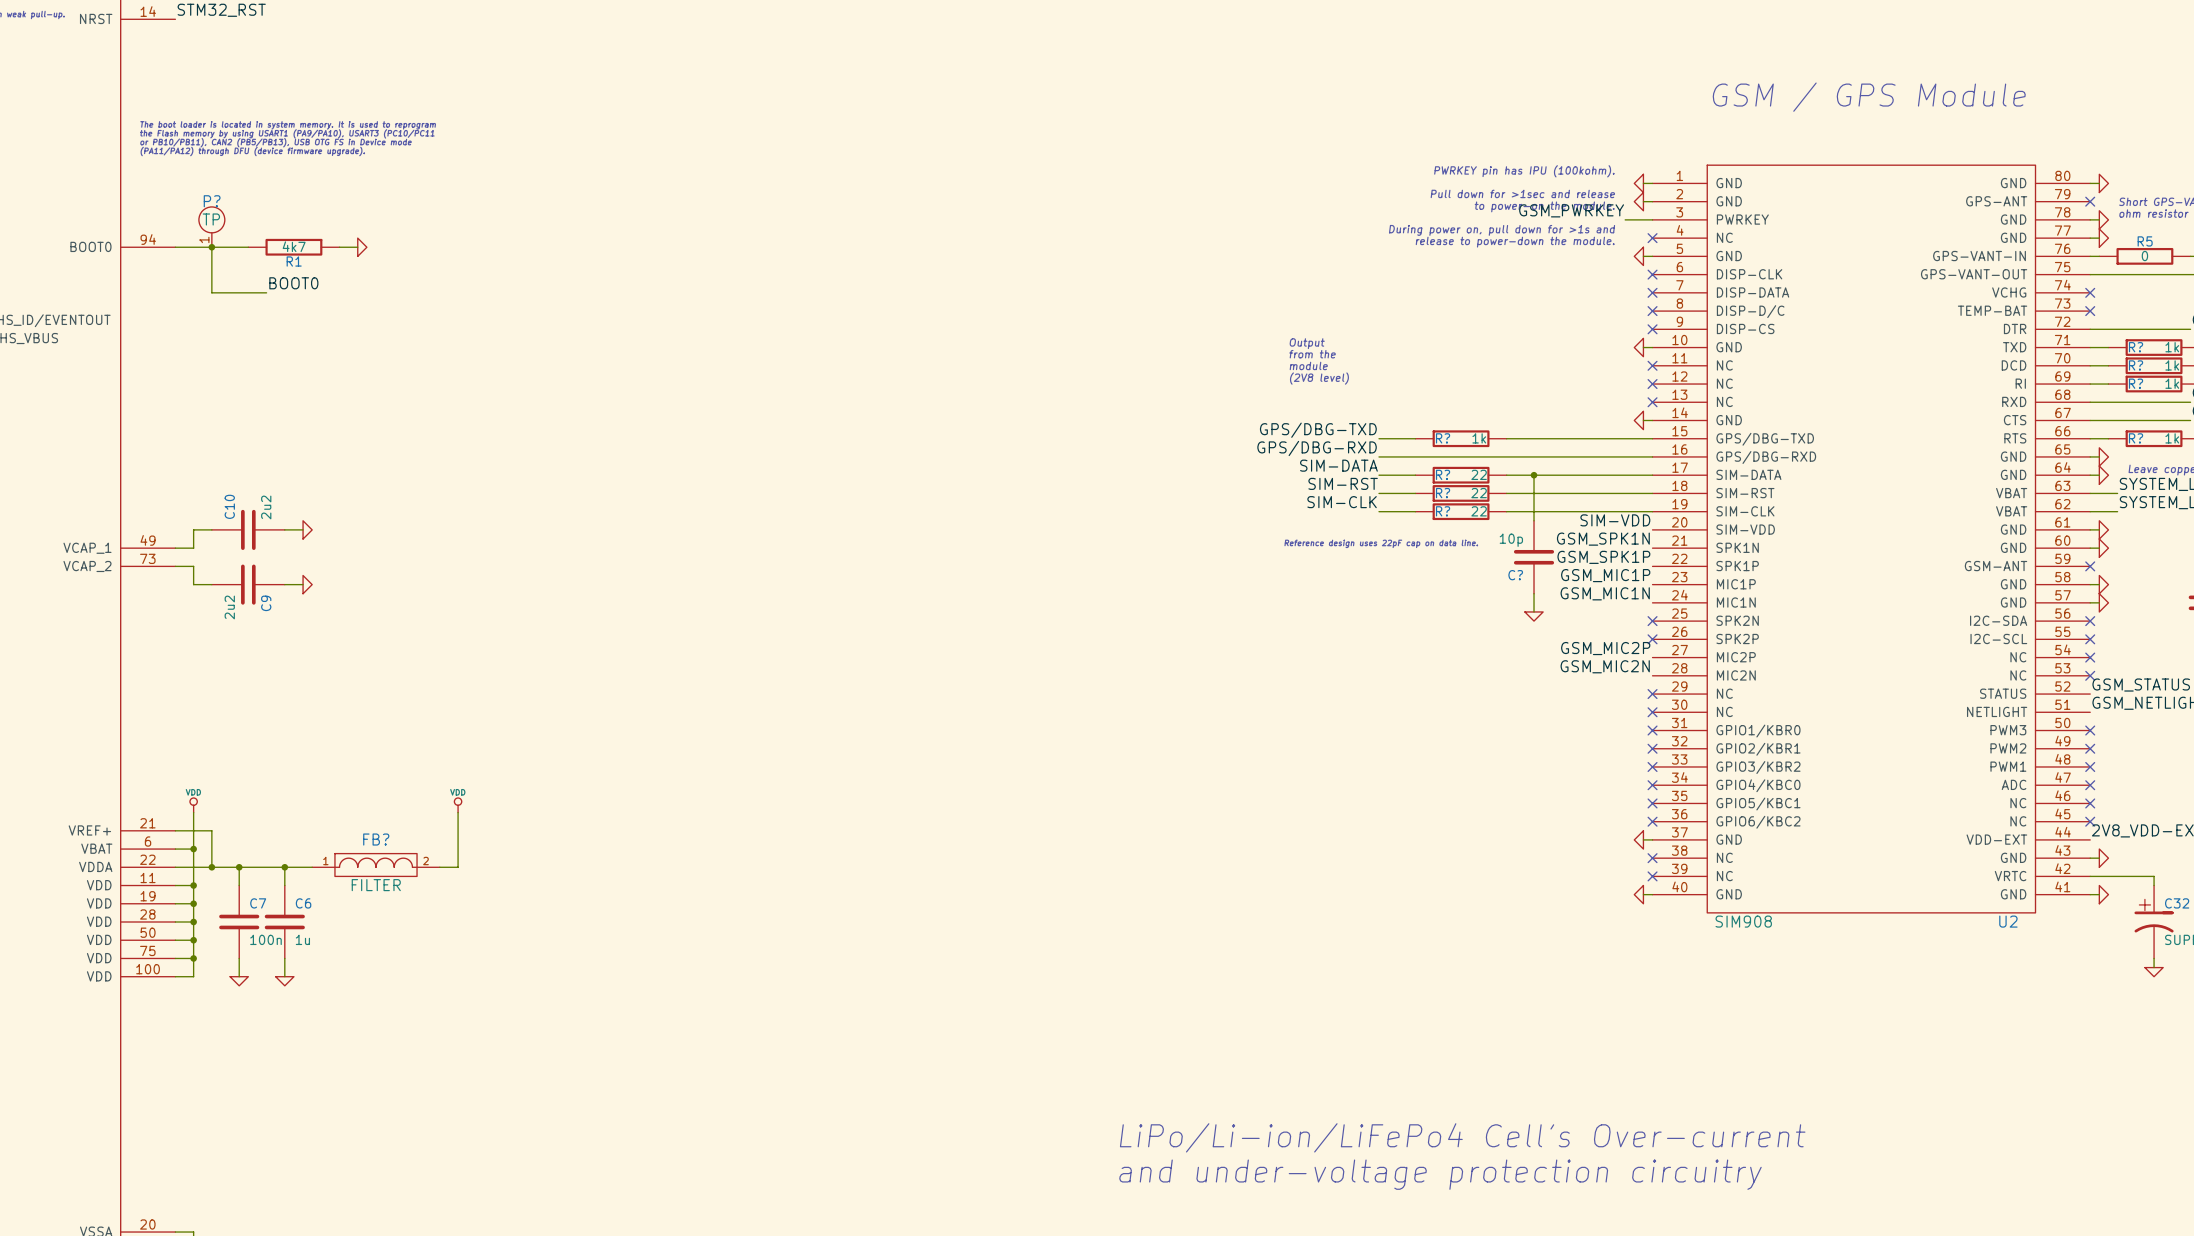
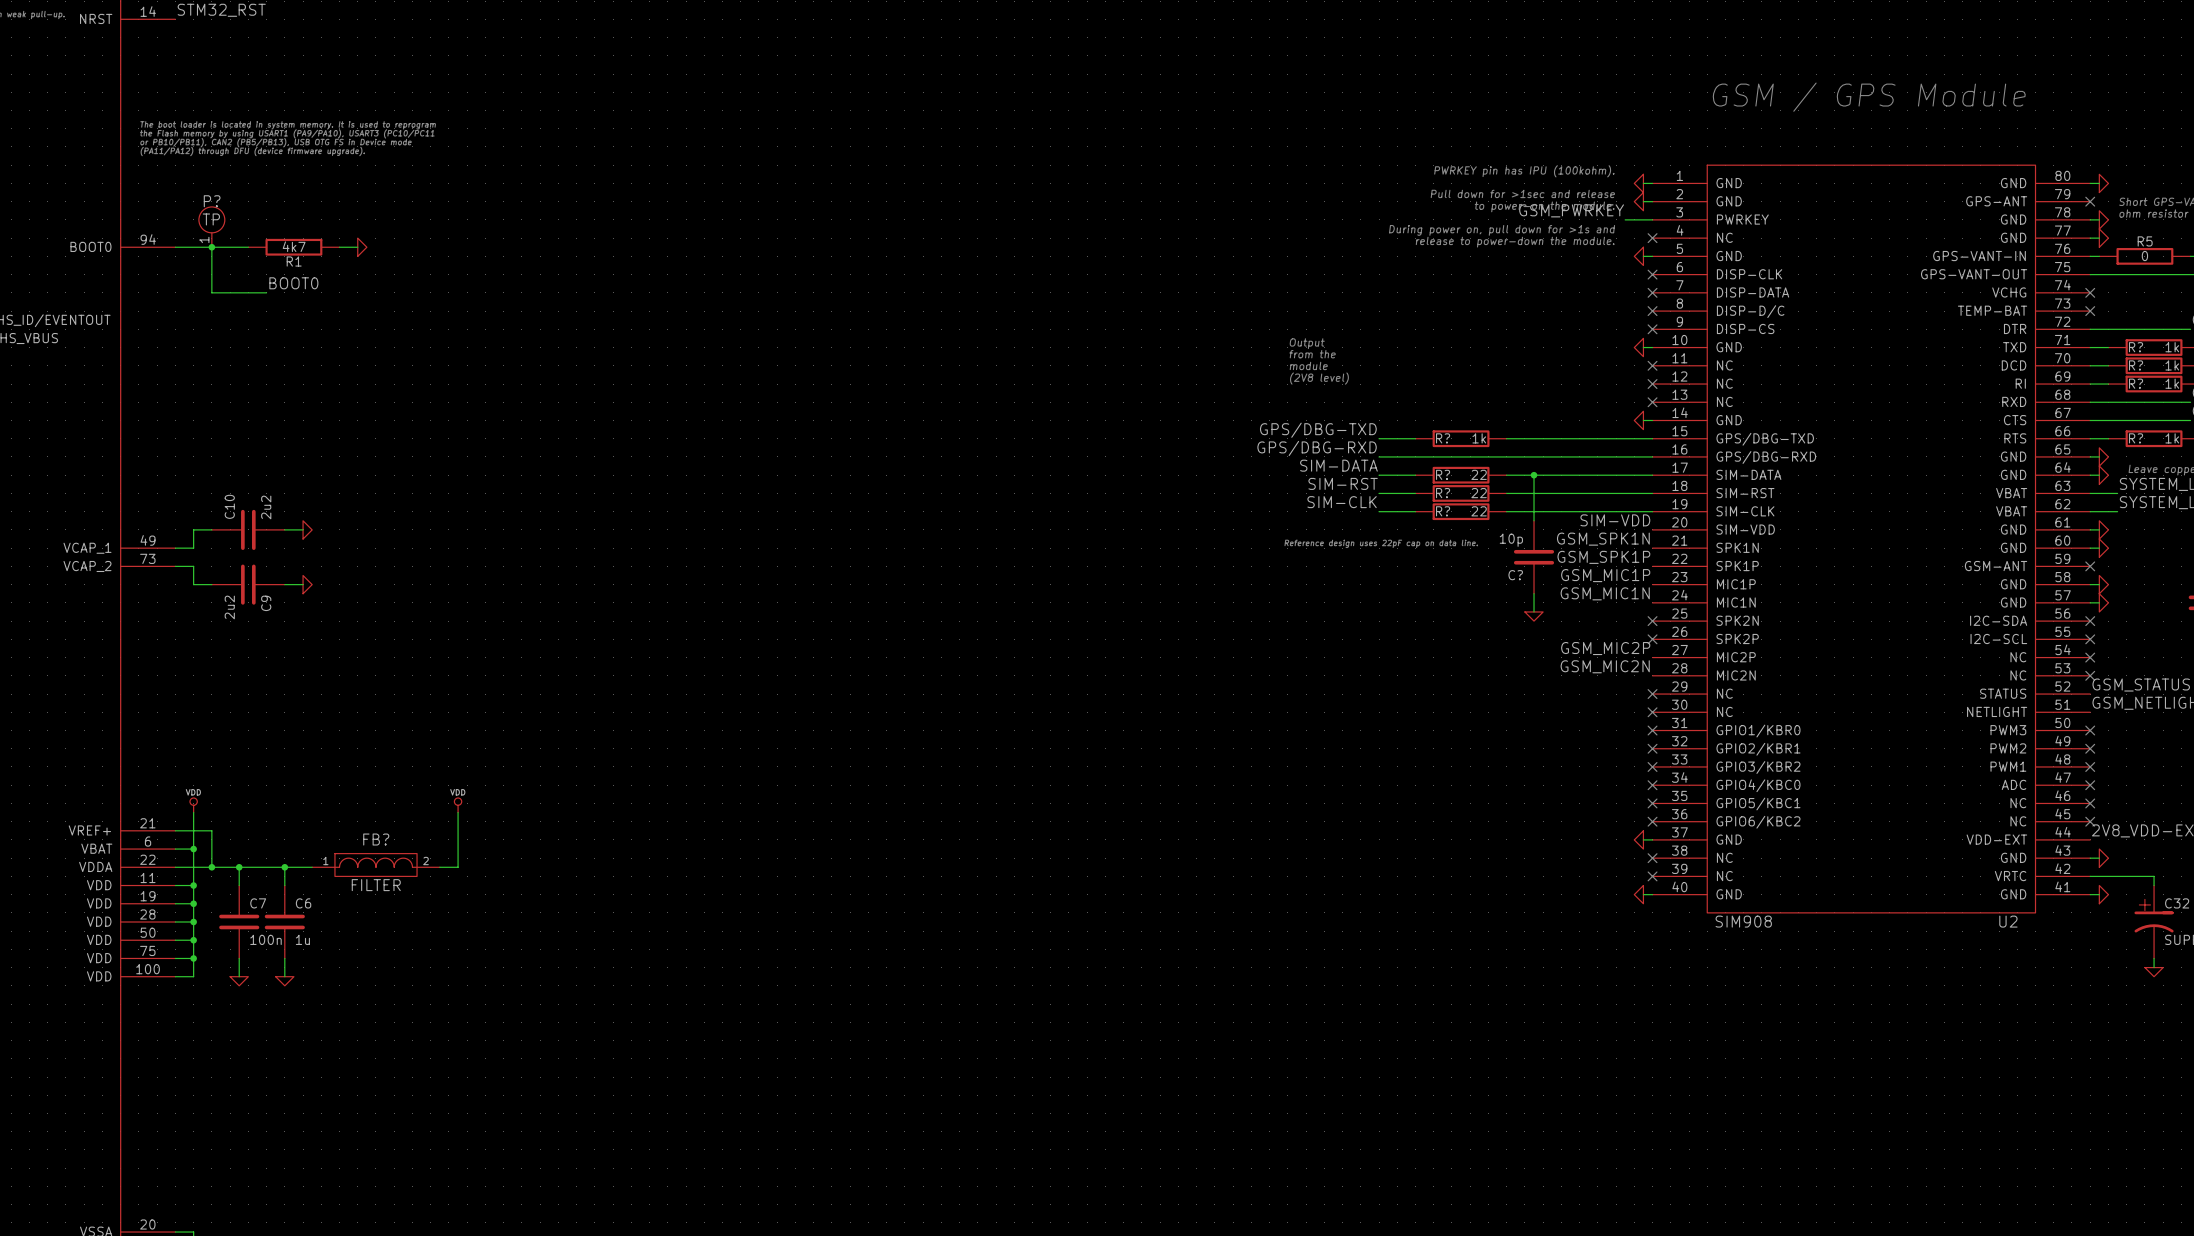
text: LiPo/Li-ion/LiFePo4 Cell's Over-current (1462, 1137) -> none
text: and under-voltage protection circuitry (1440, 1174) -> none

